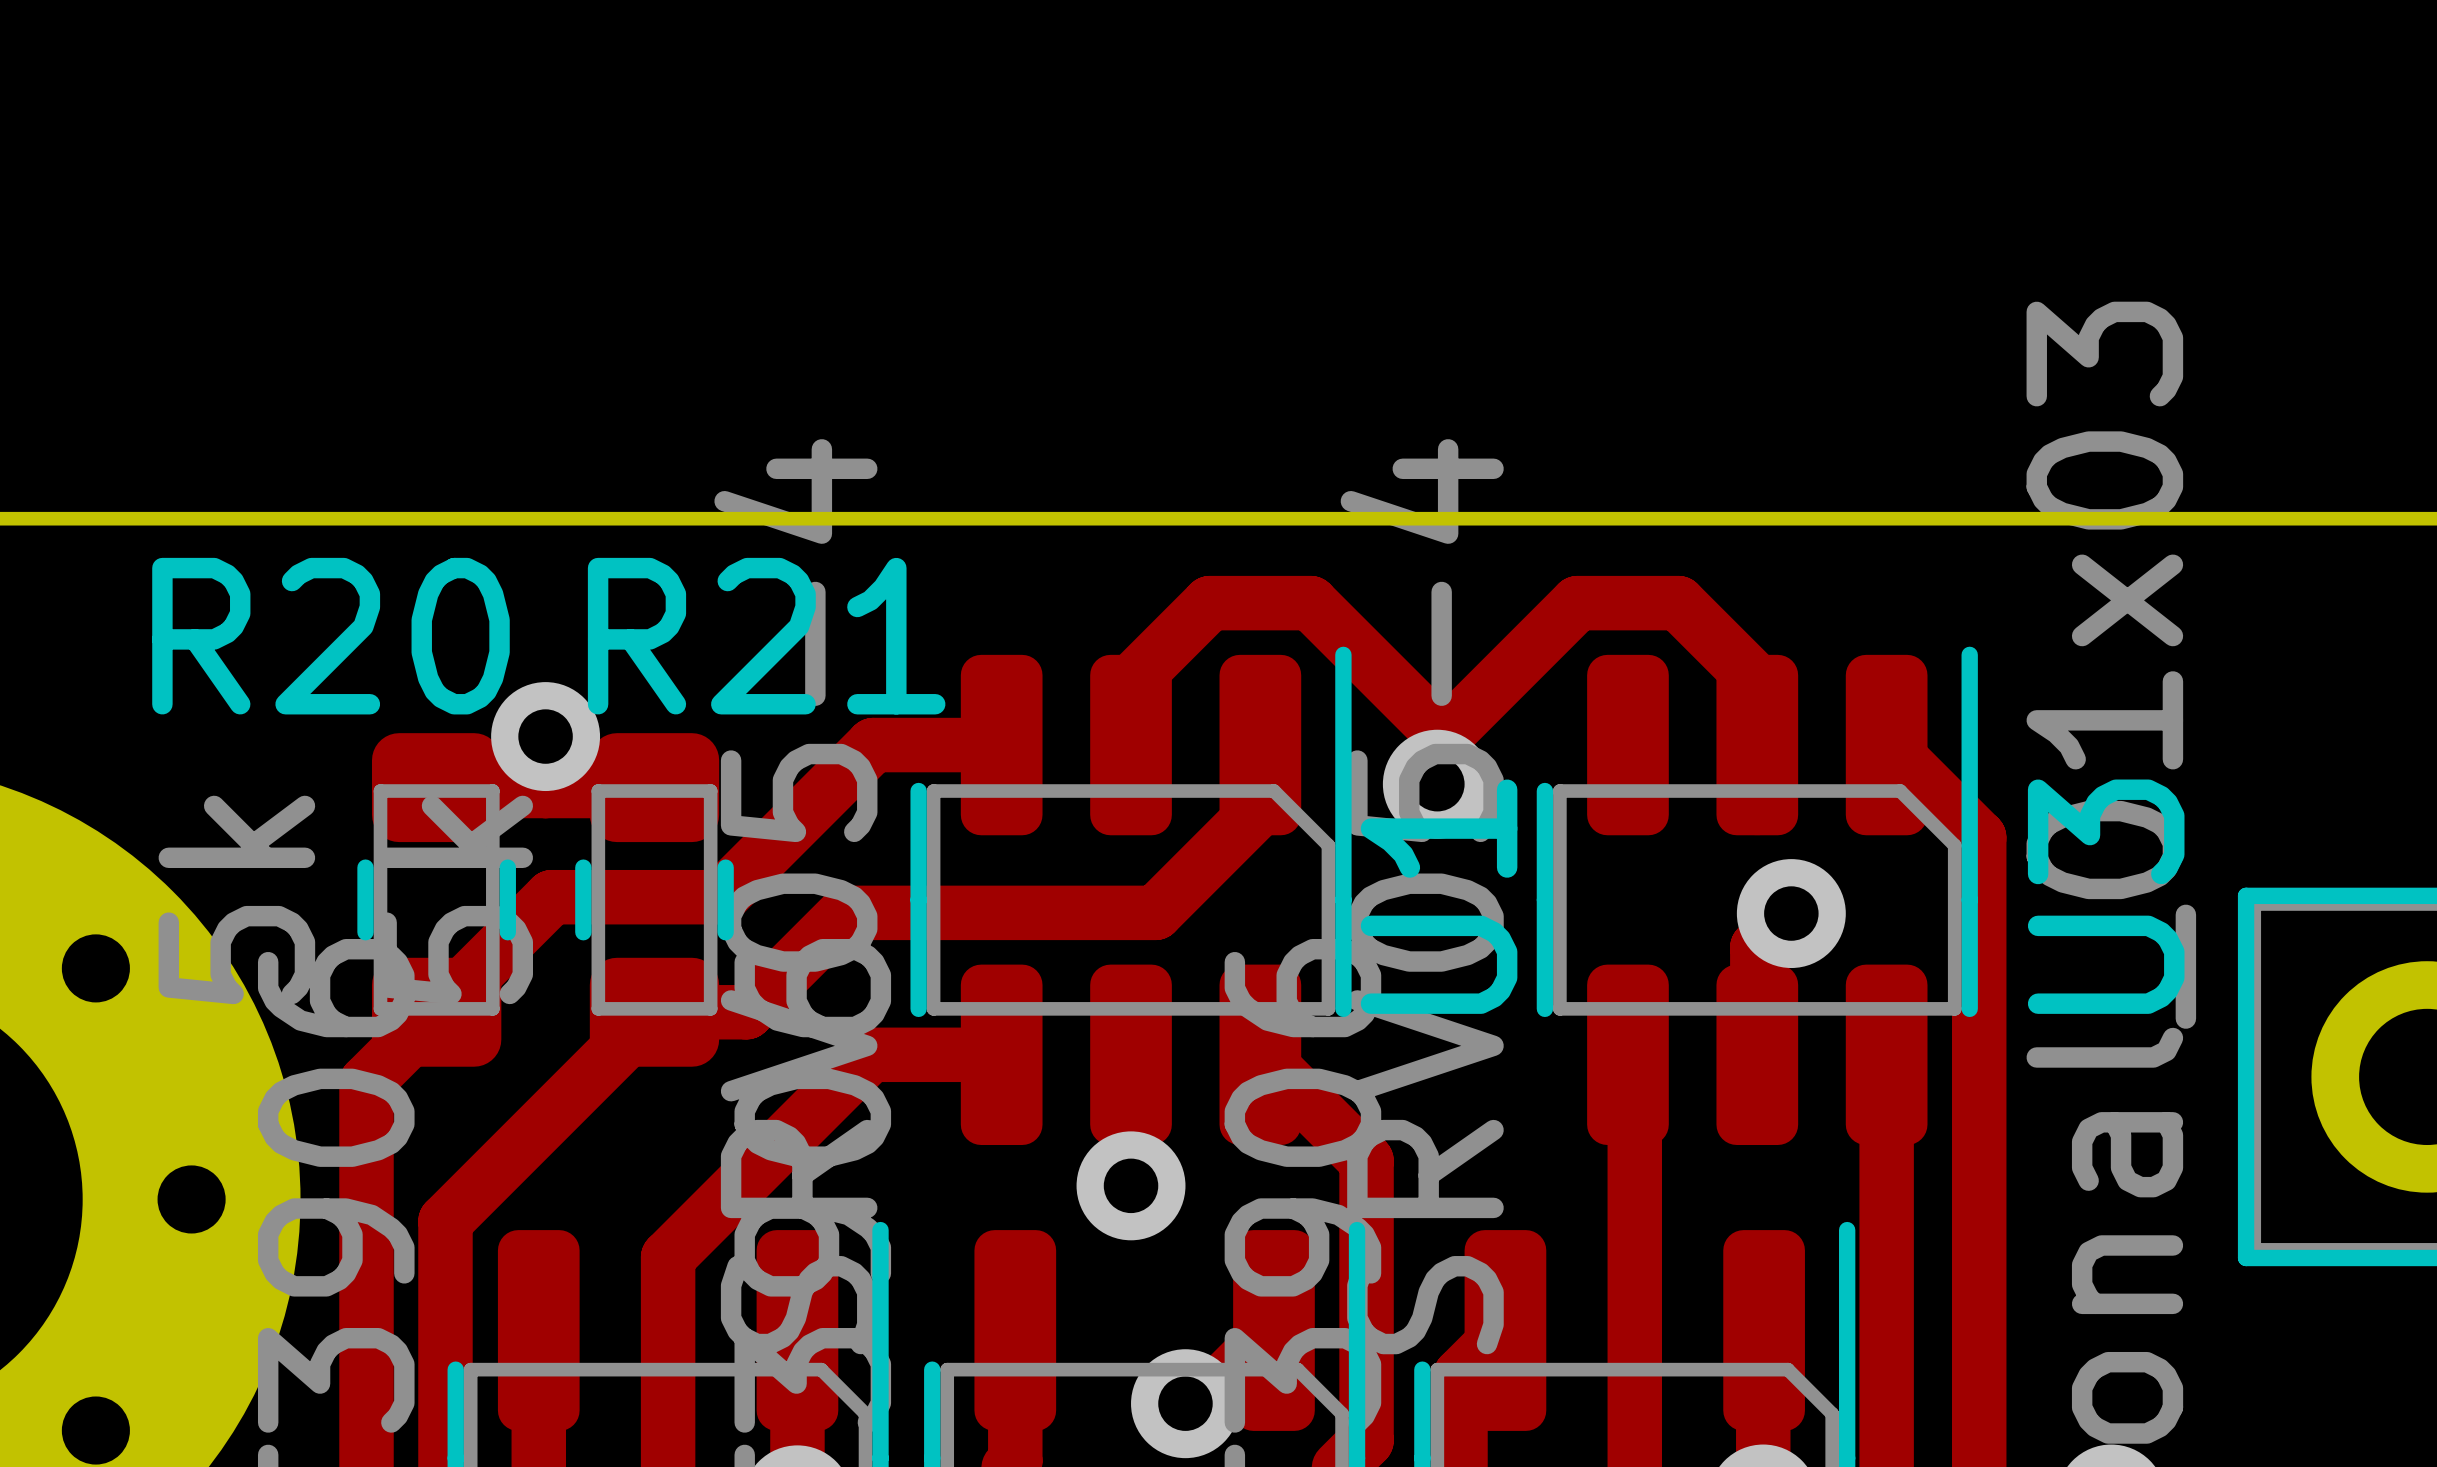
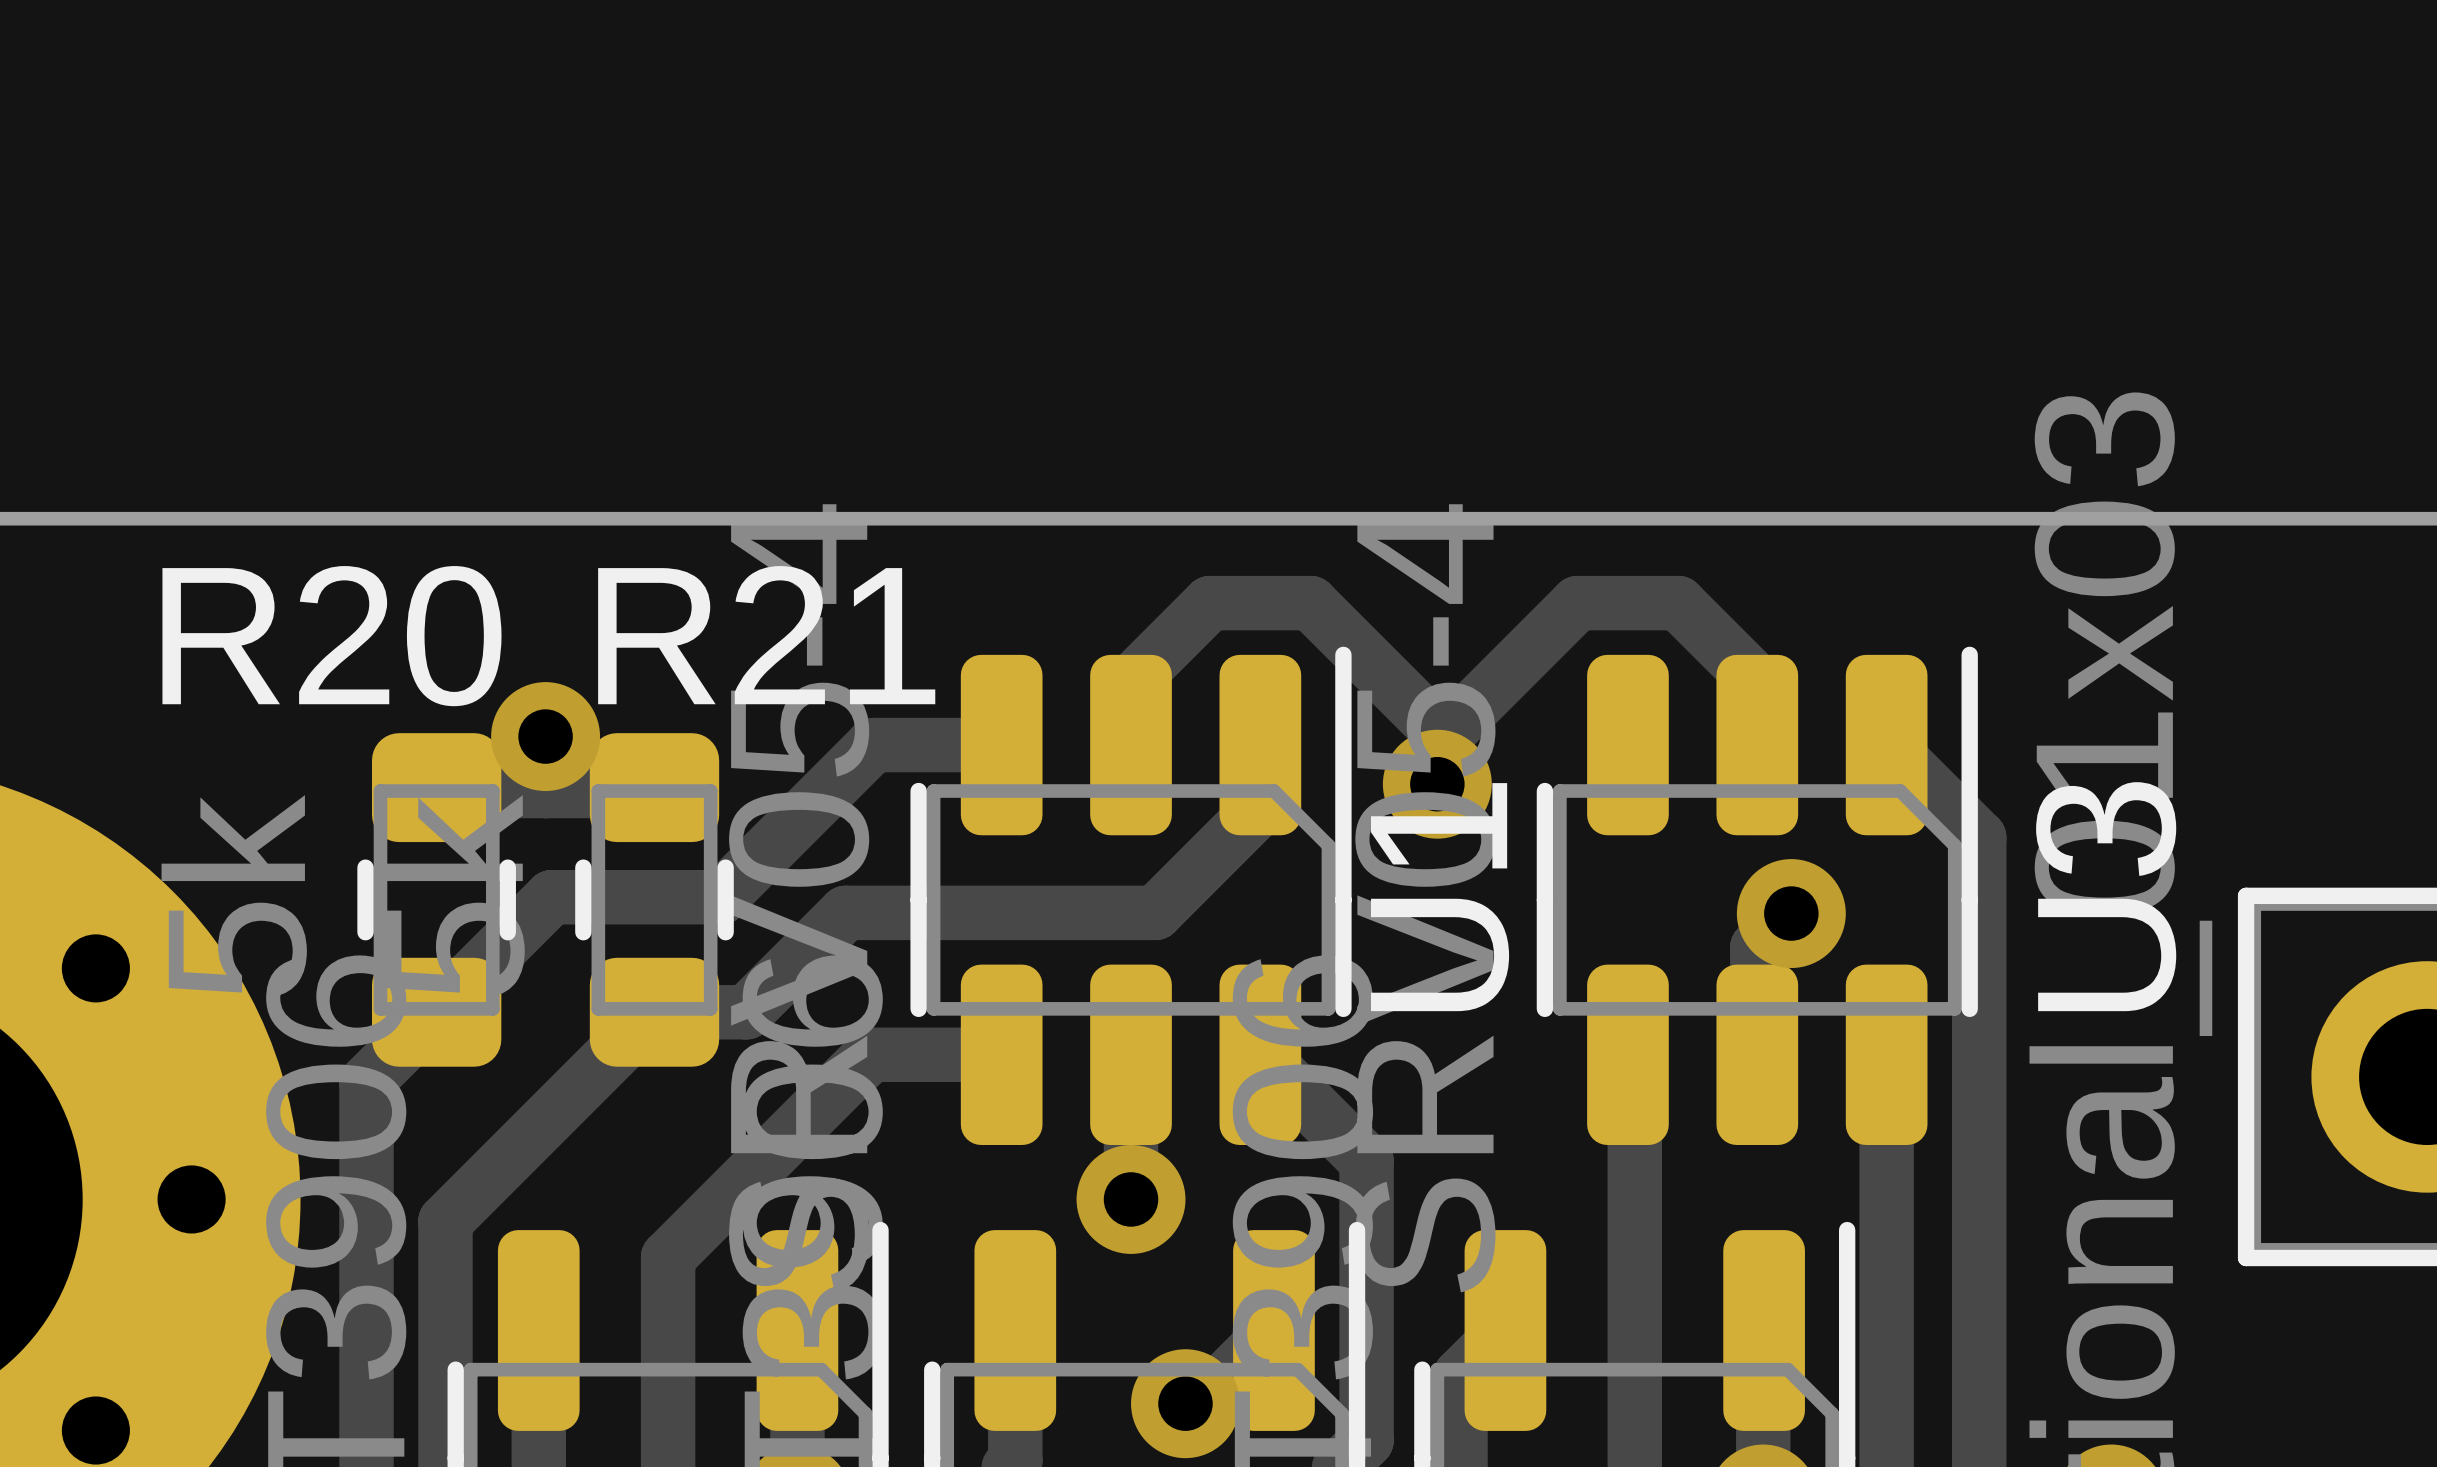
via position: (1131, 1185) -> (1131, 1199)

